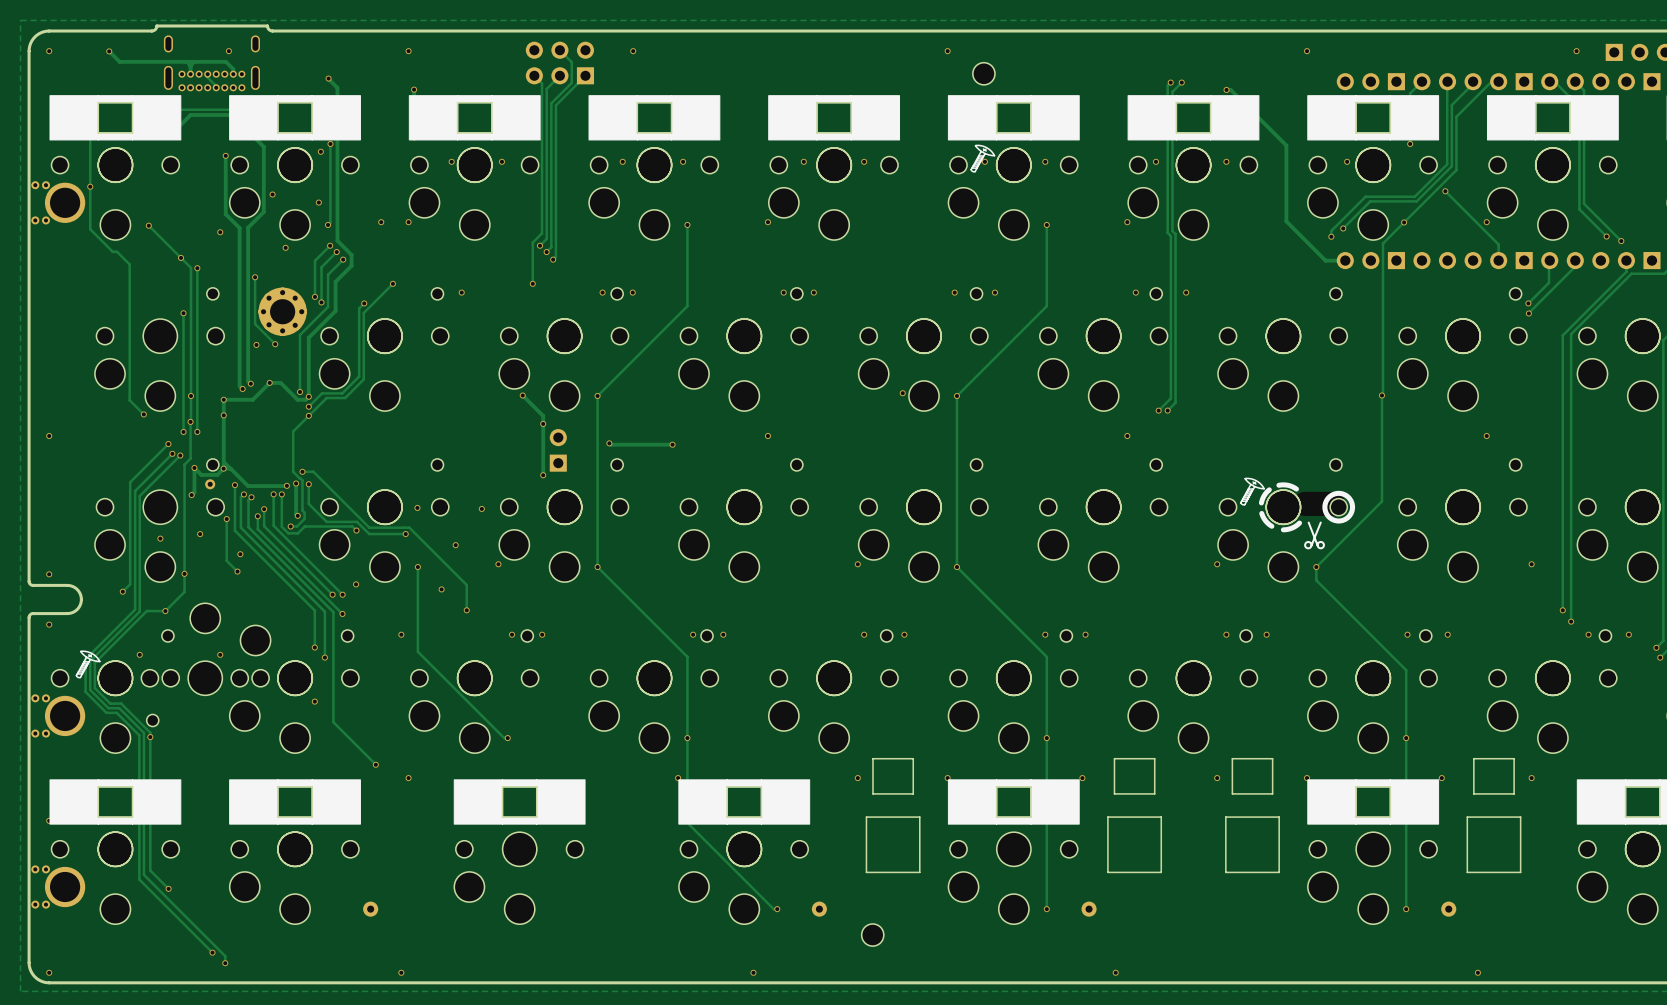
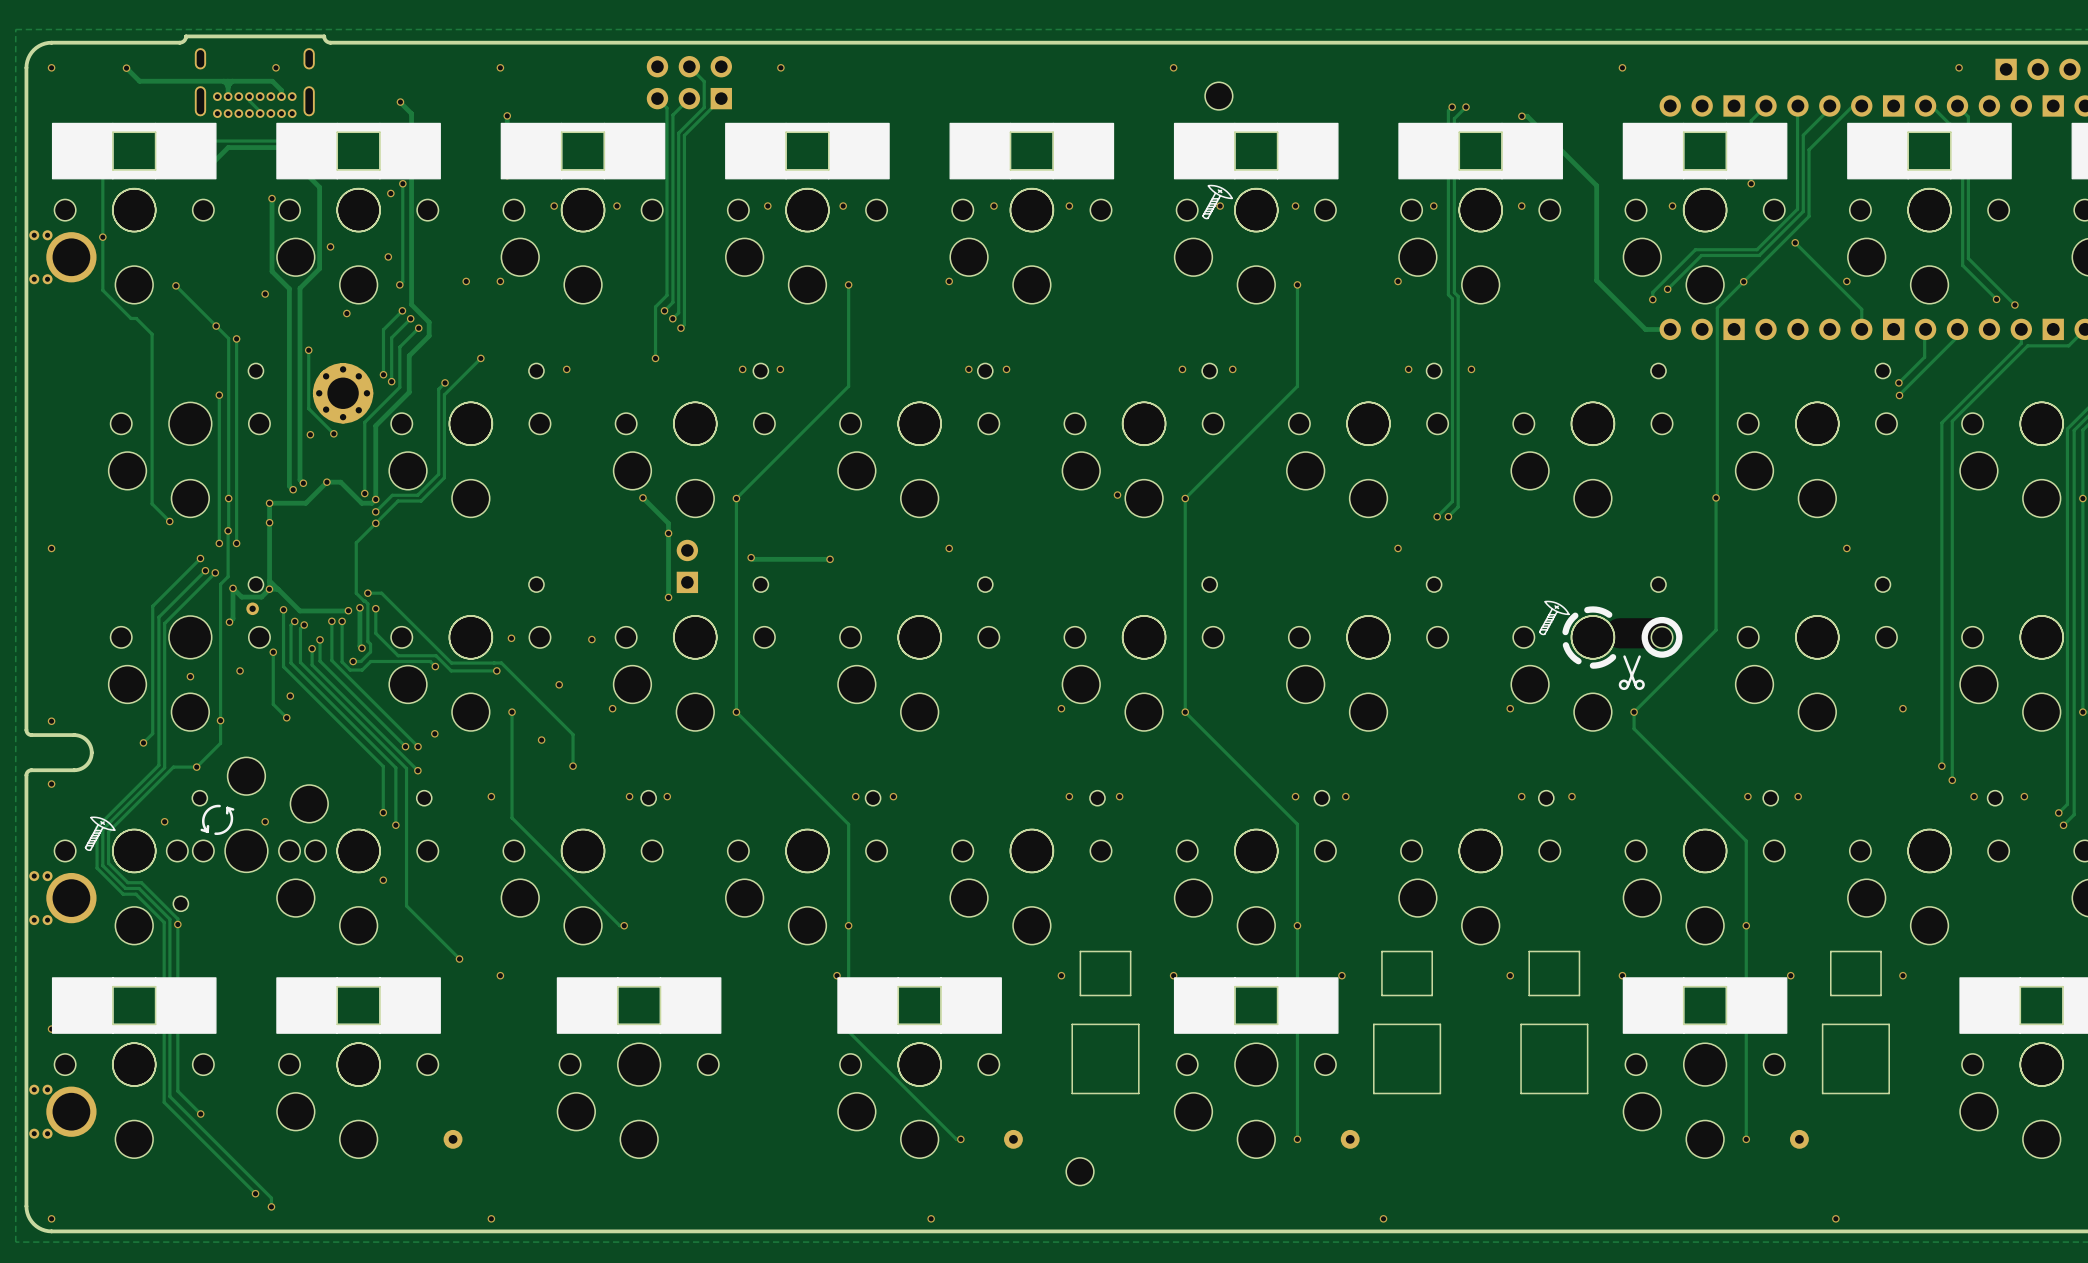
drawing: none -> [200, 804, 235, 836]

